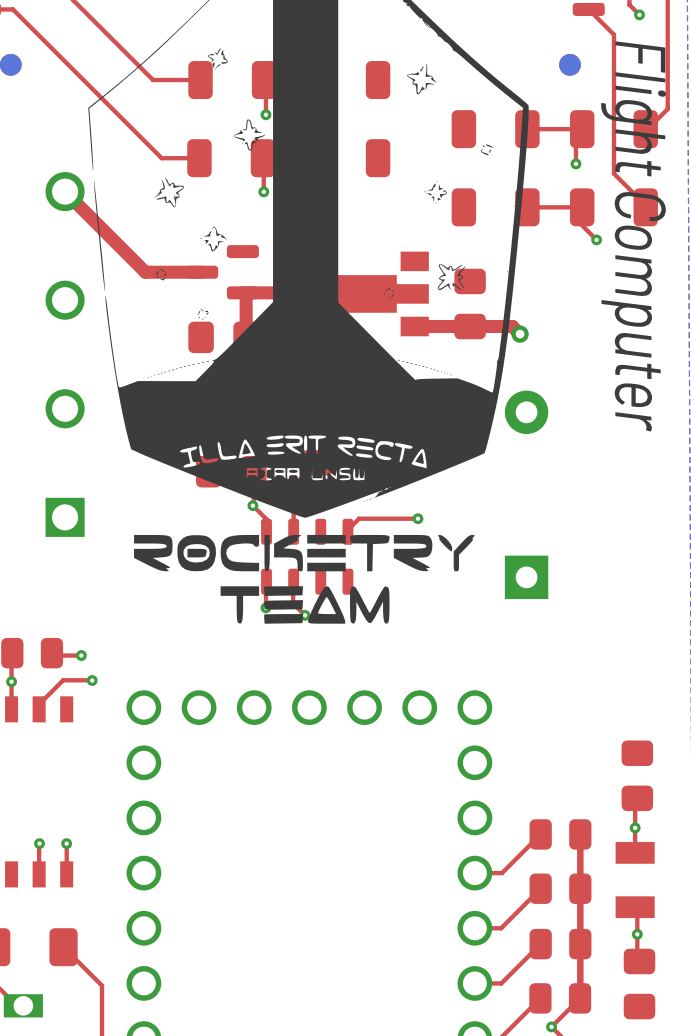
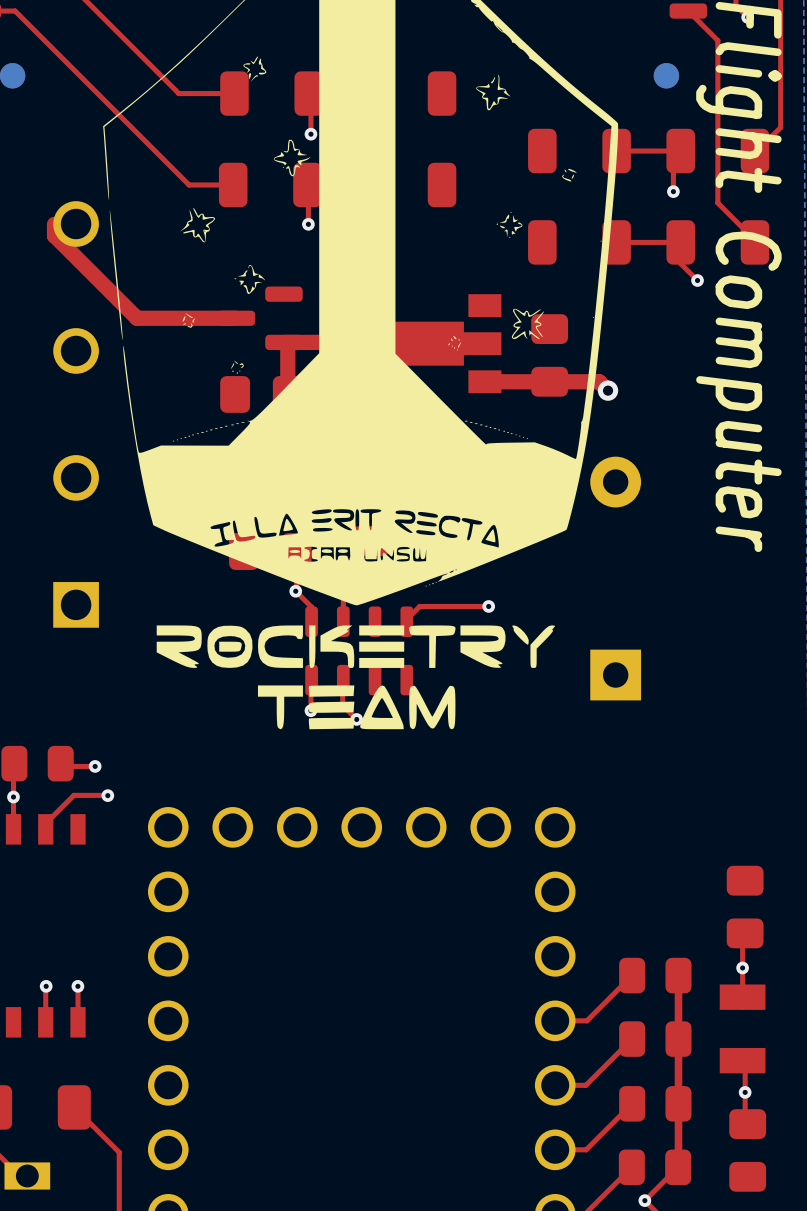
top track: (65, 191) (145, 272) -> (54, 224) (54, 235) (137, 318) (170, 318)

